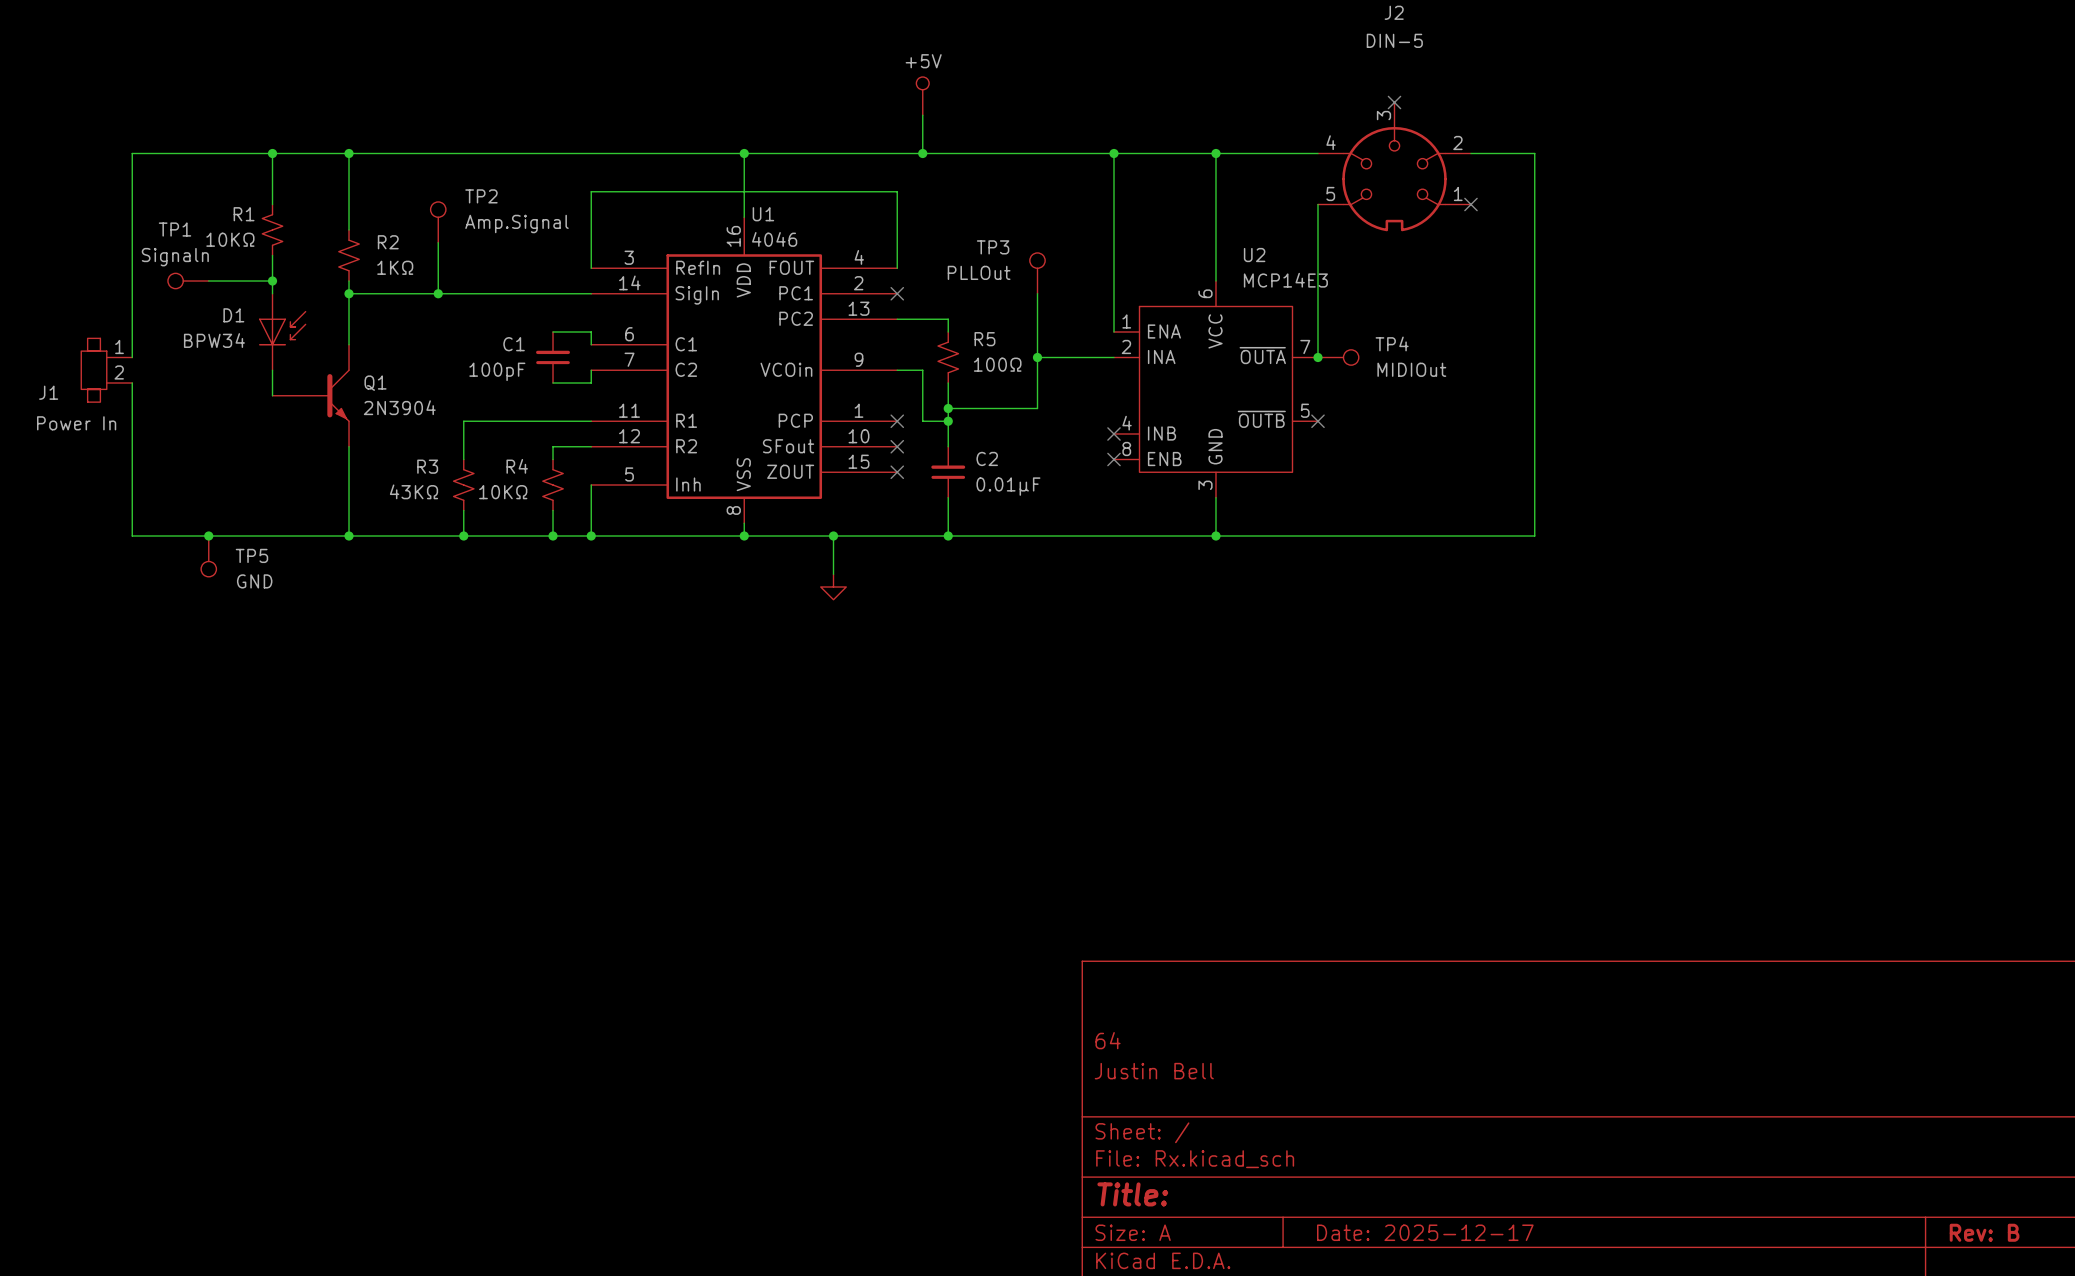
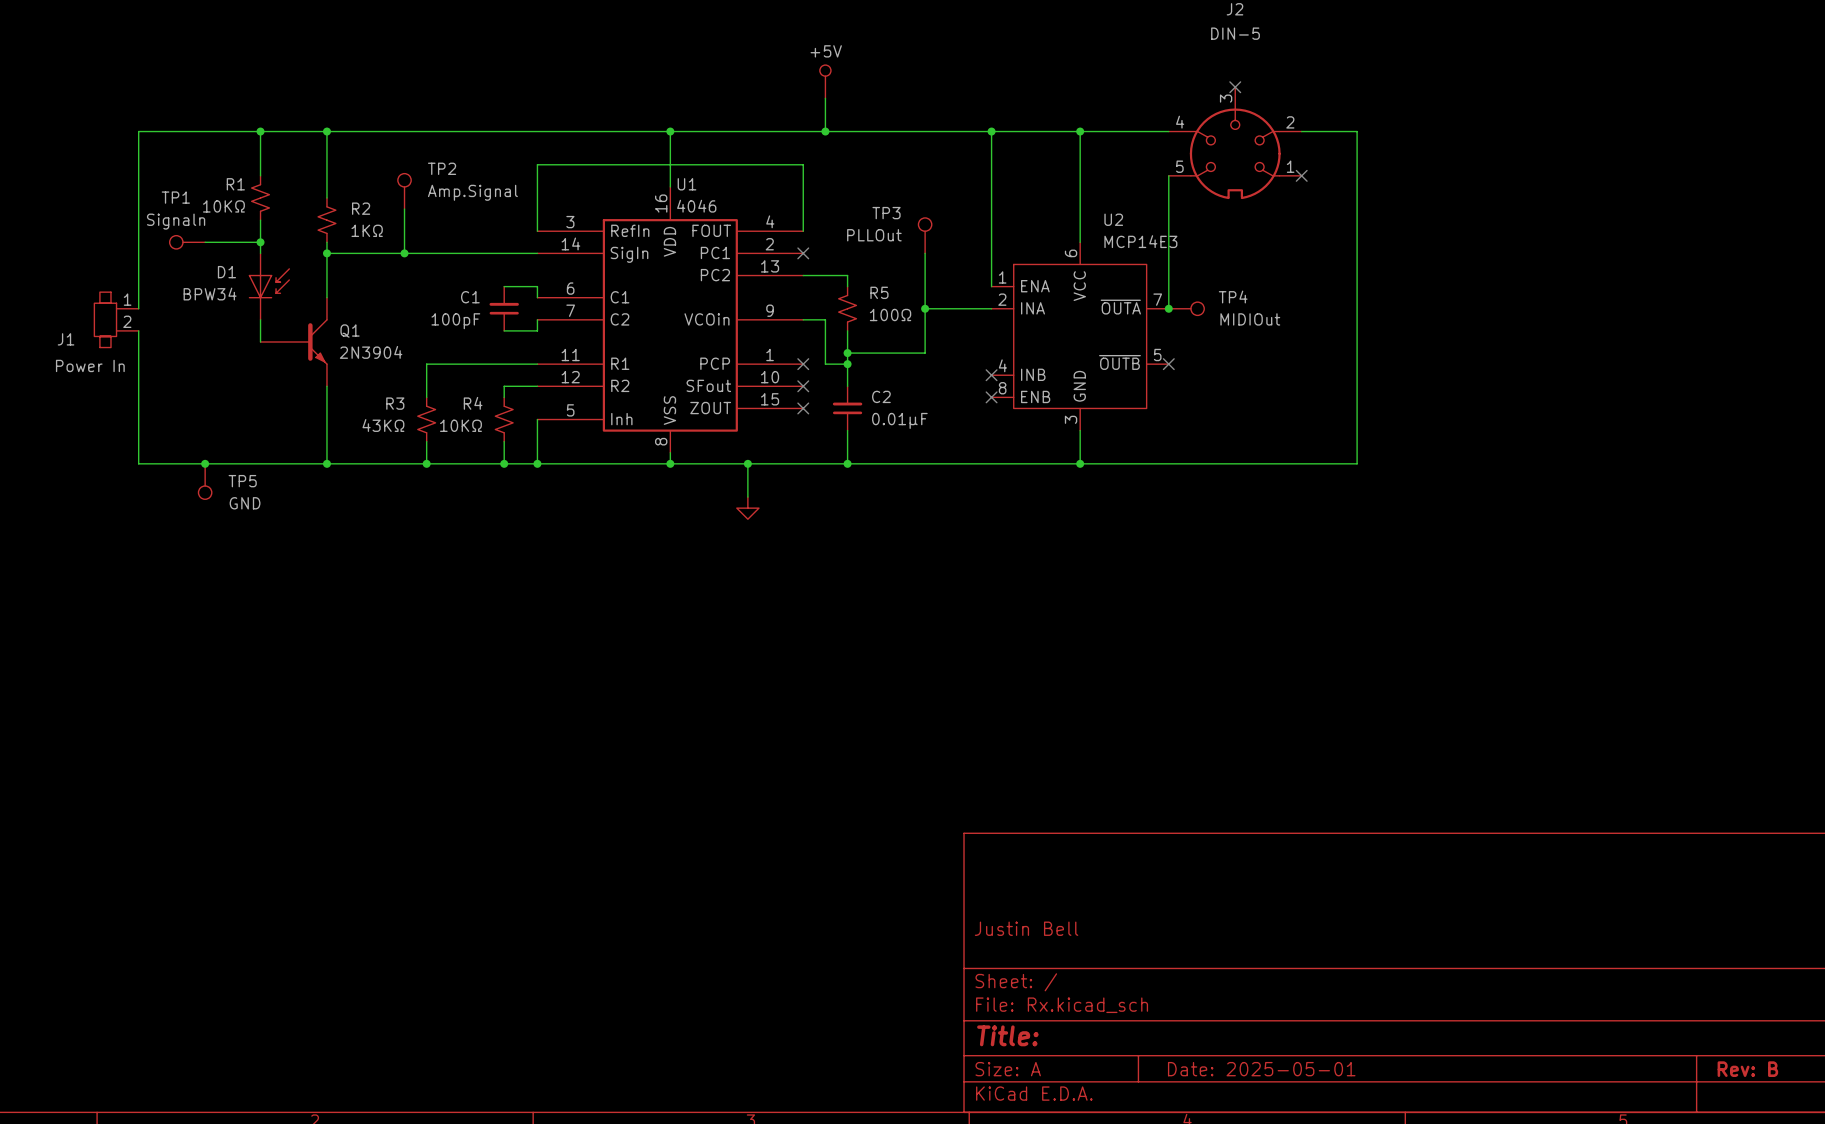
title block: 64 (1108, 1040) -> none
title block: Date: 2025-12-17 (1425, 1232) -> Date: 2025-05-01 (1261, 1069)

